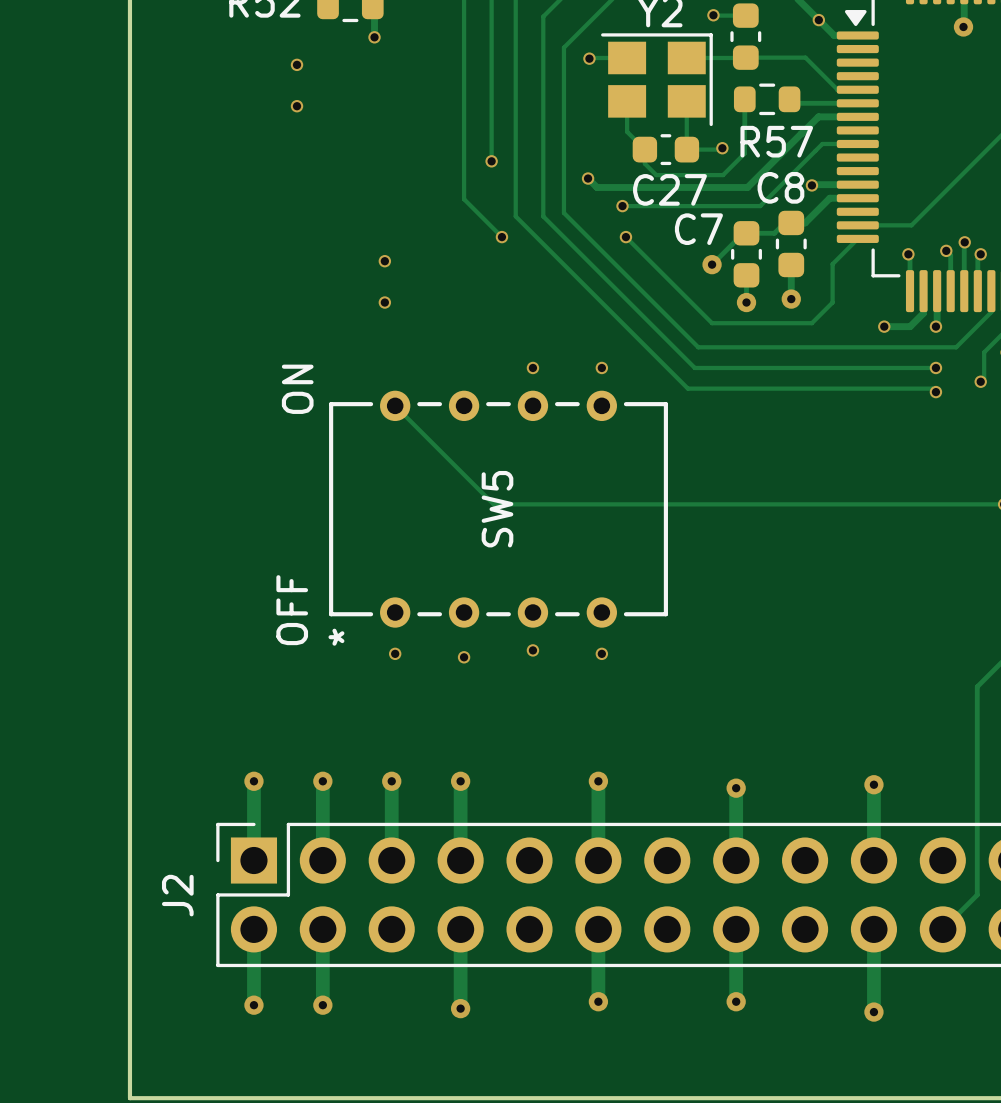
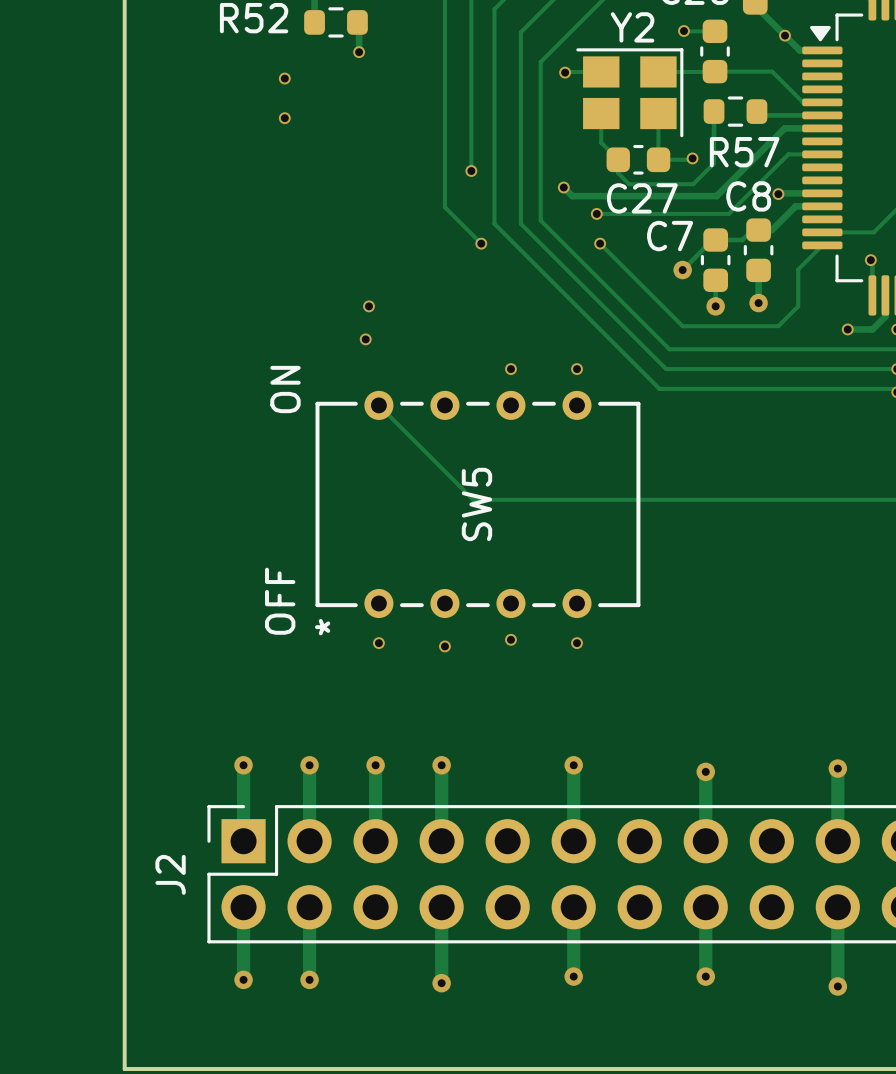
via position: (384, 261) -> (365, 339)

